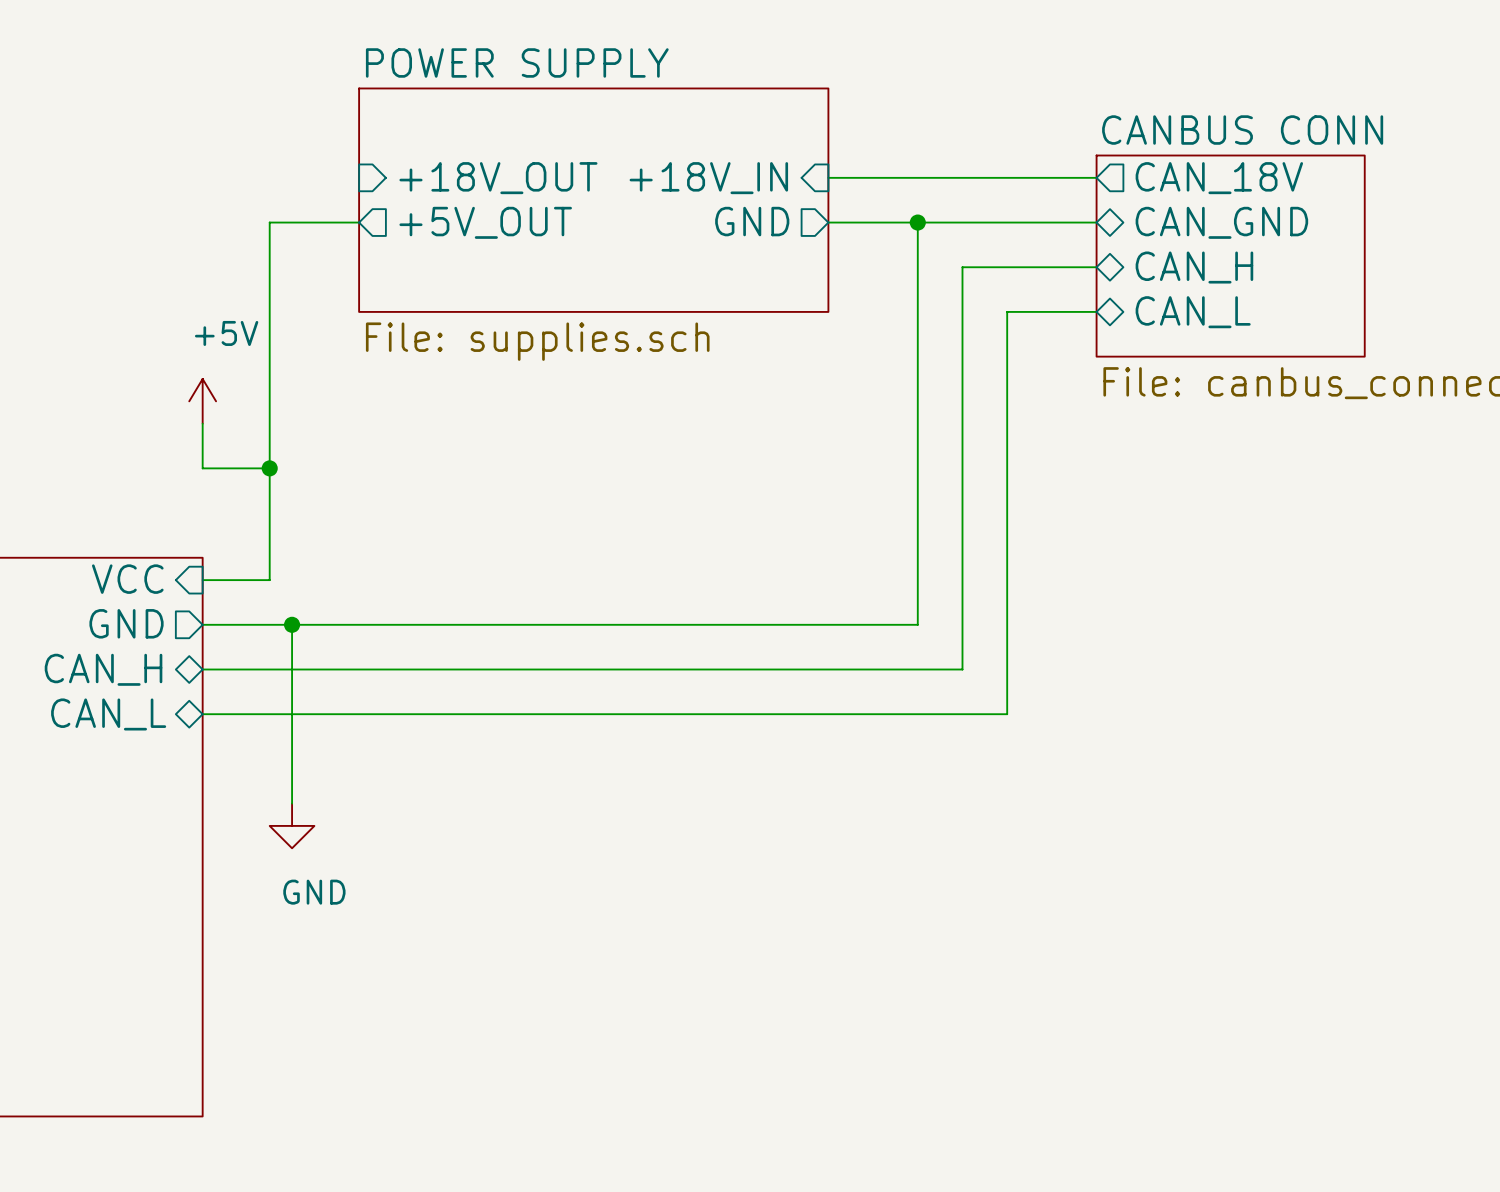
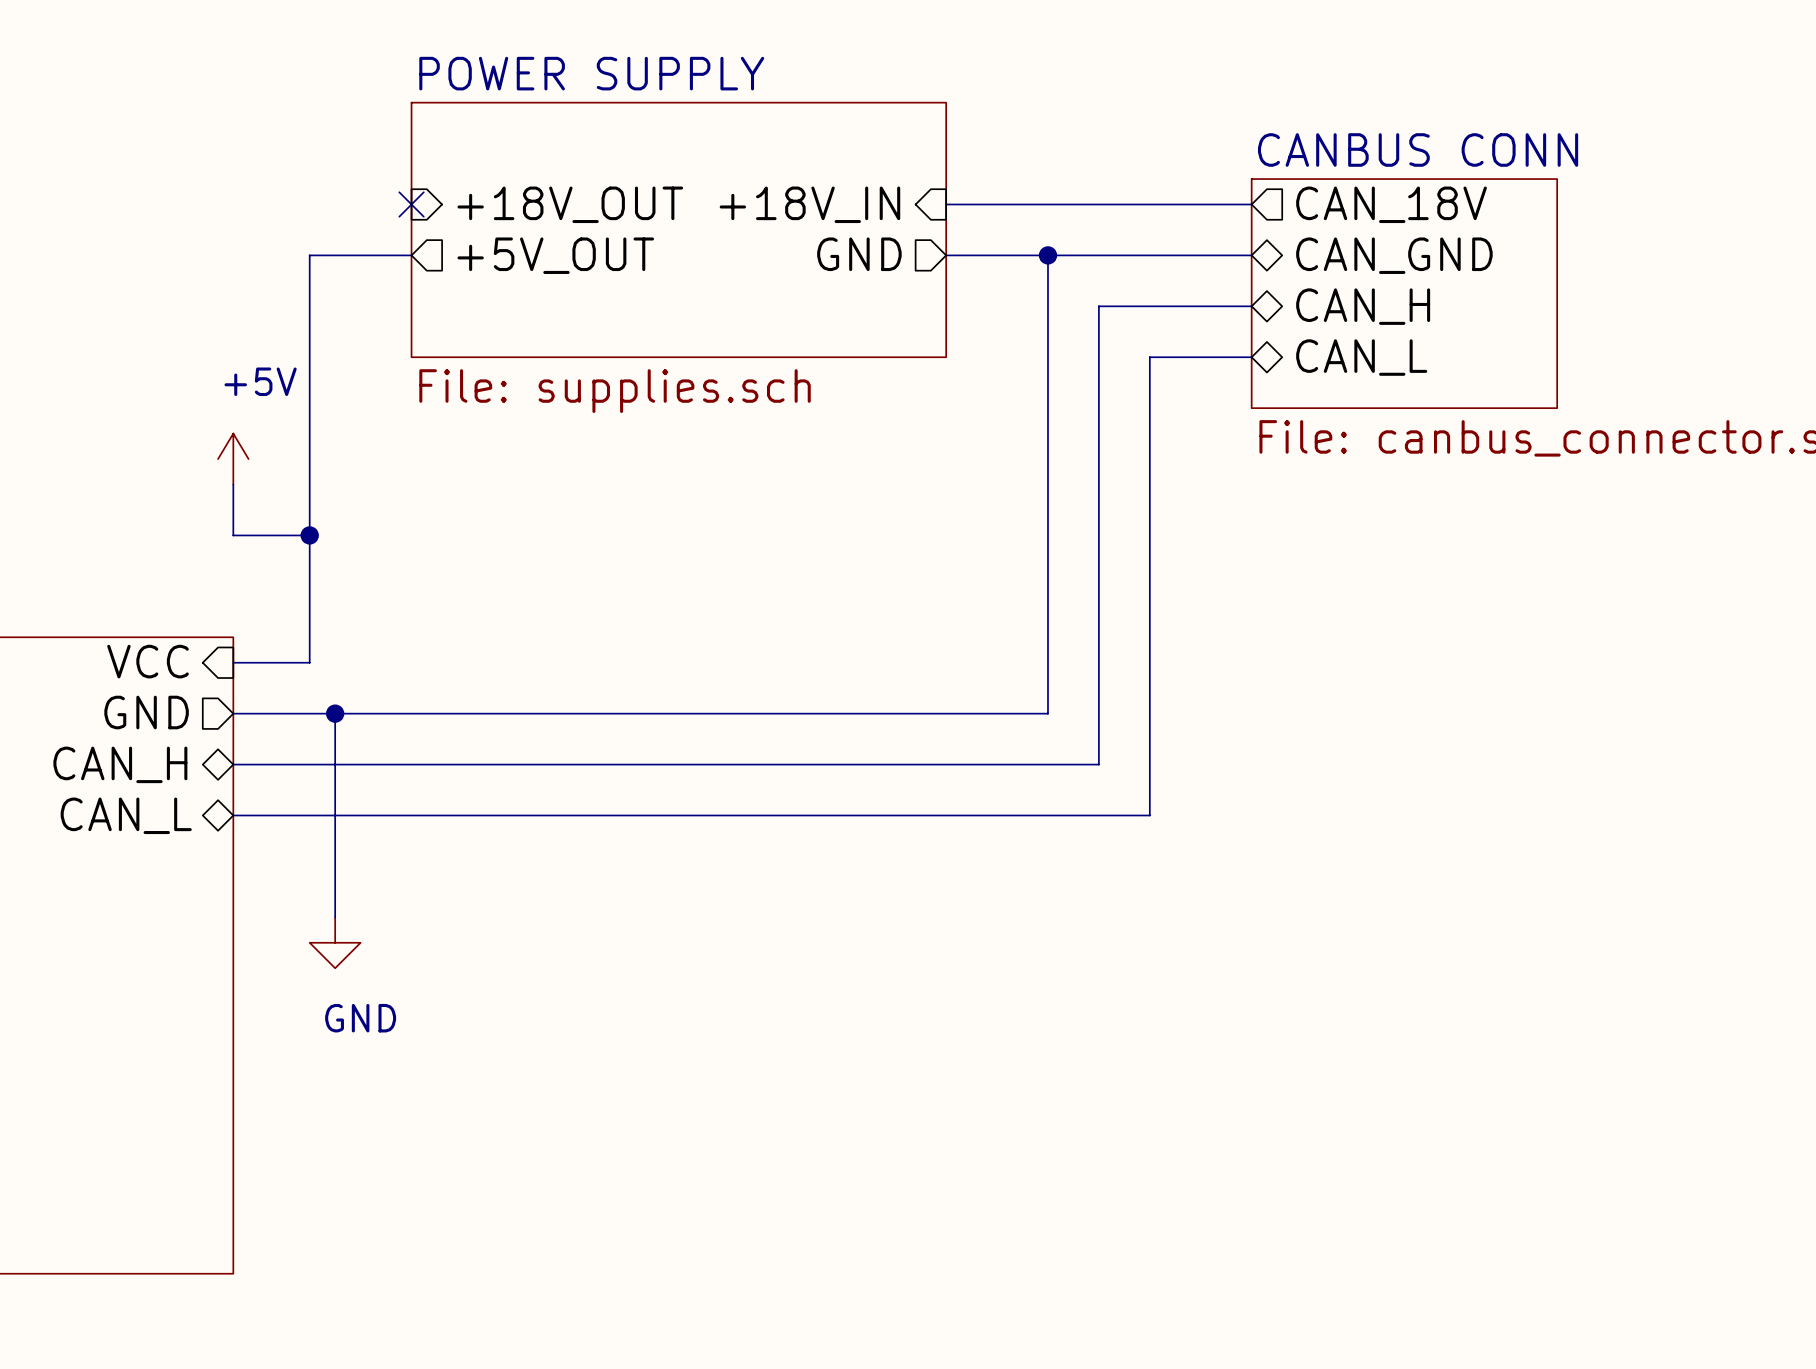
no-connect mark: none -> (411, 204)

